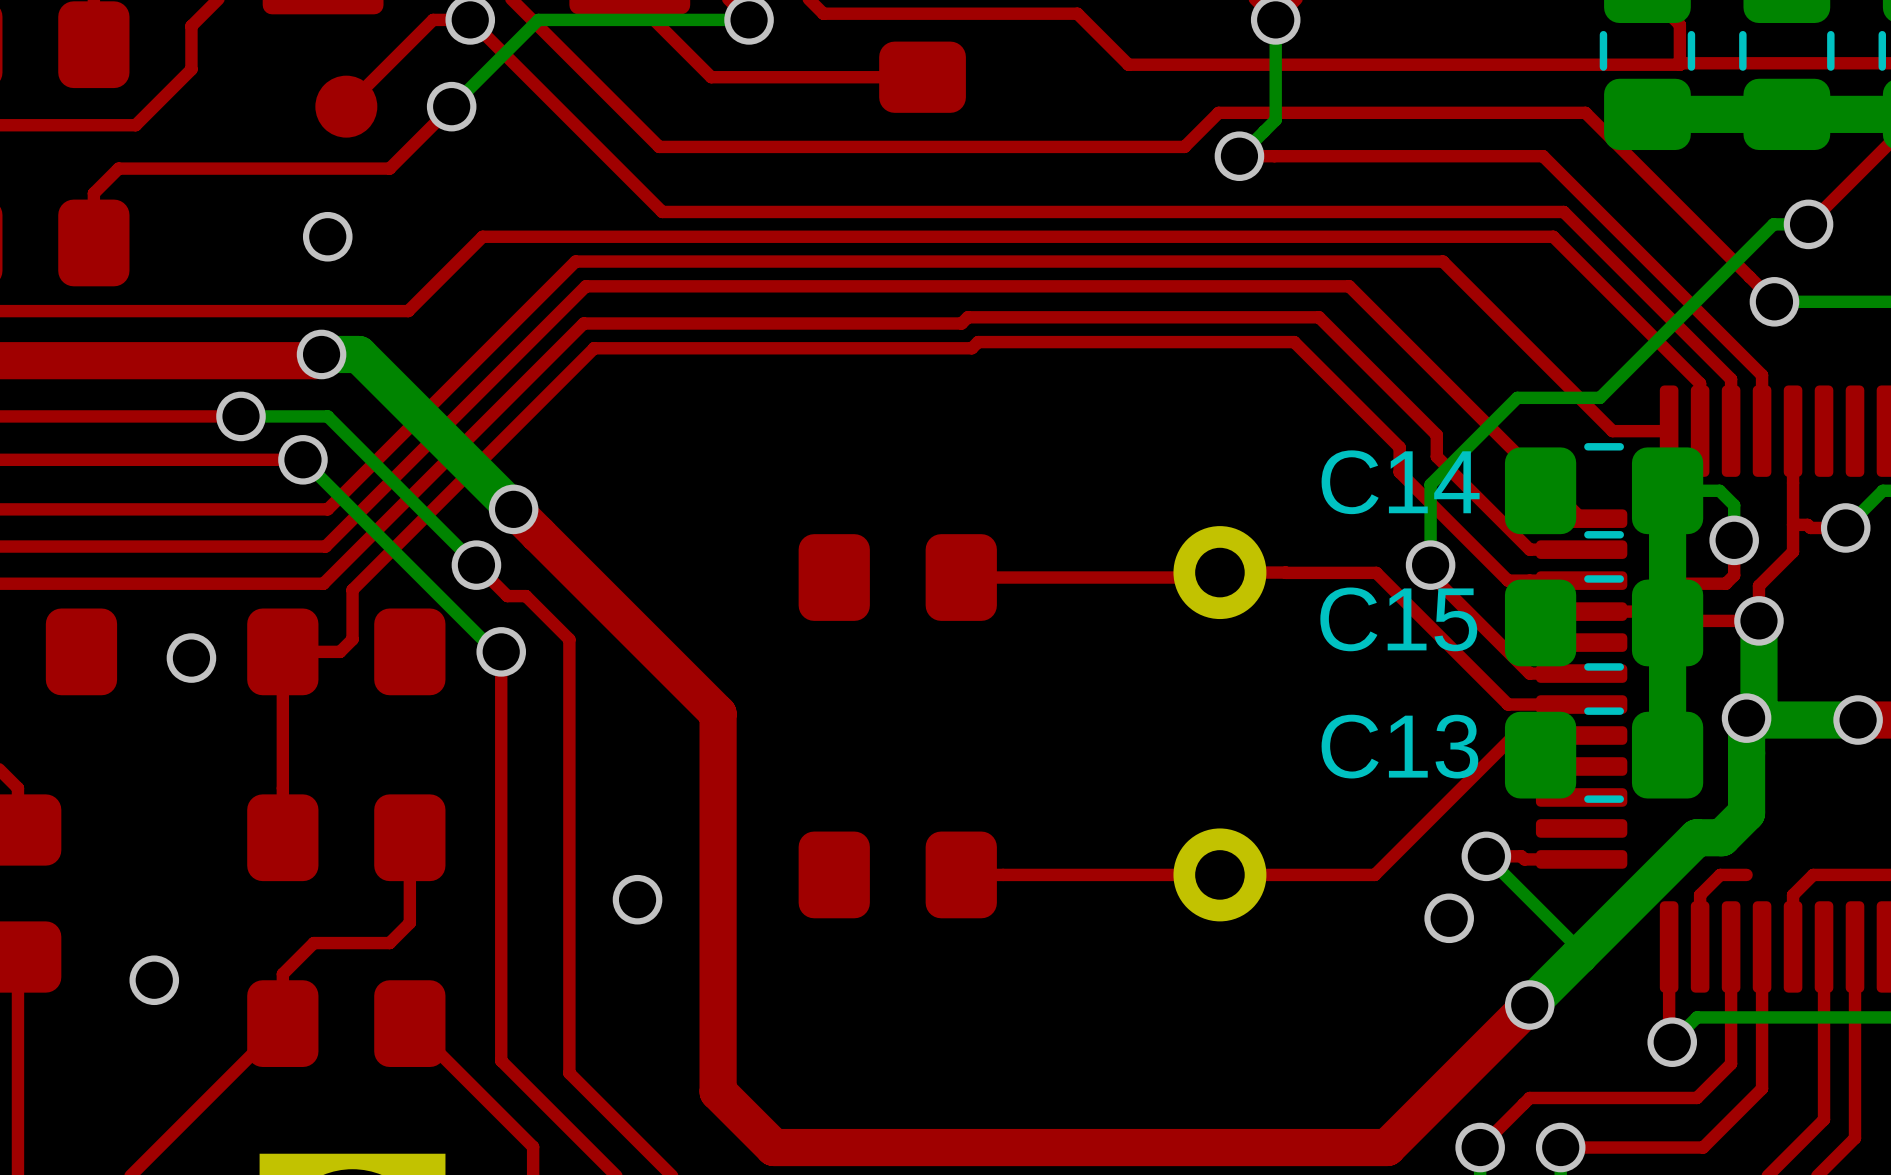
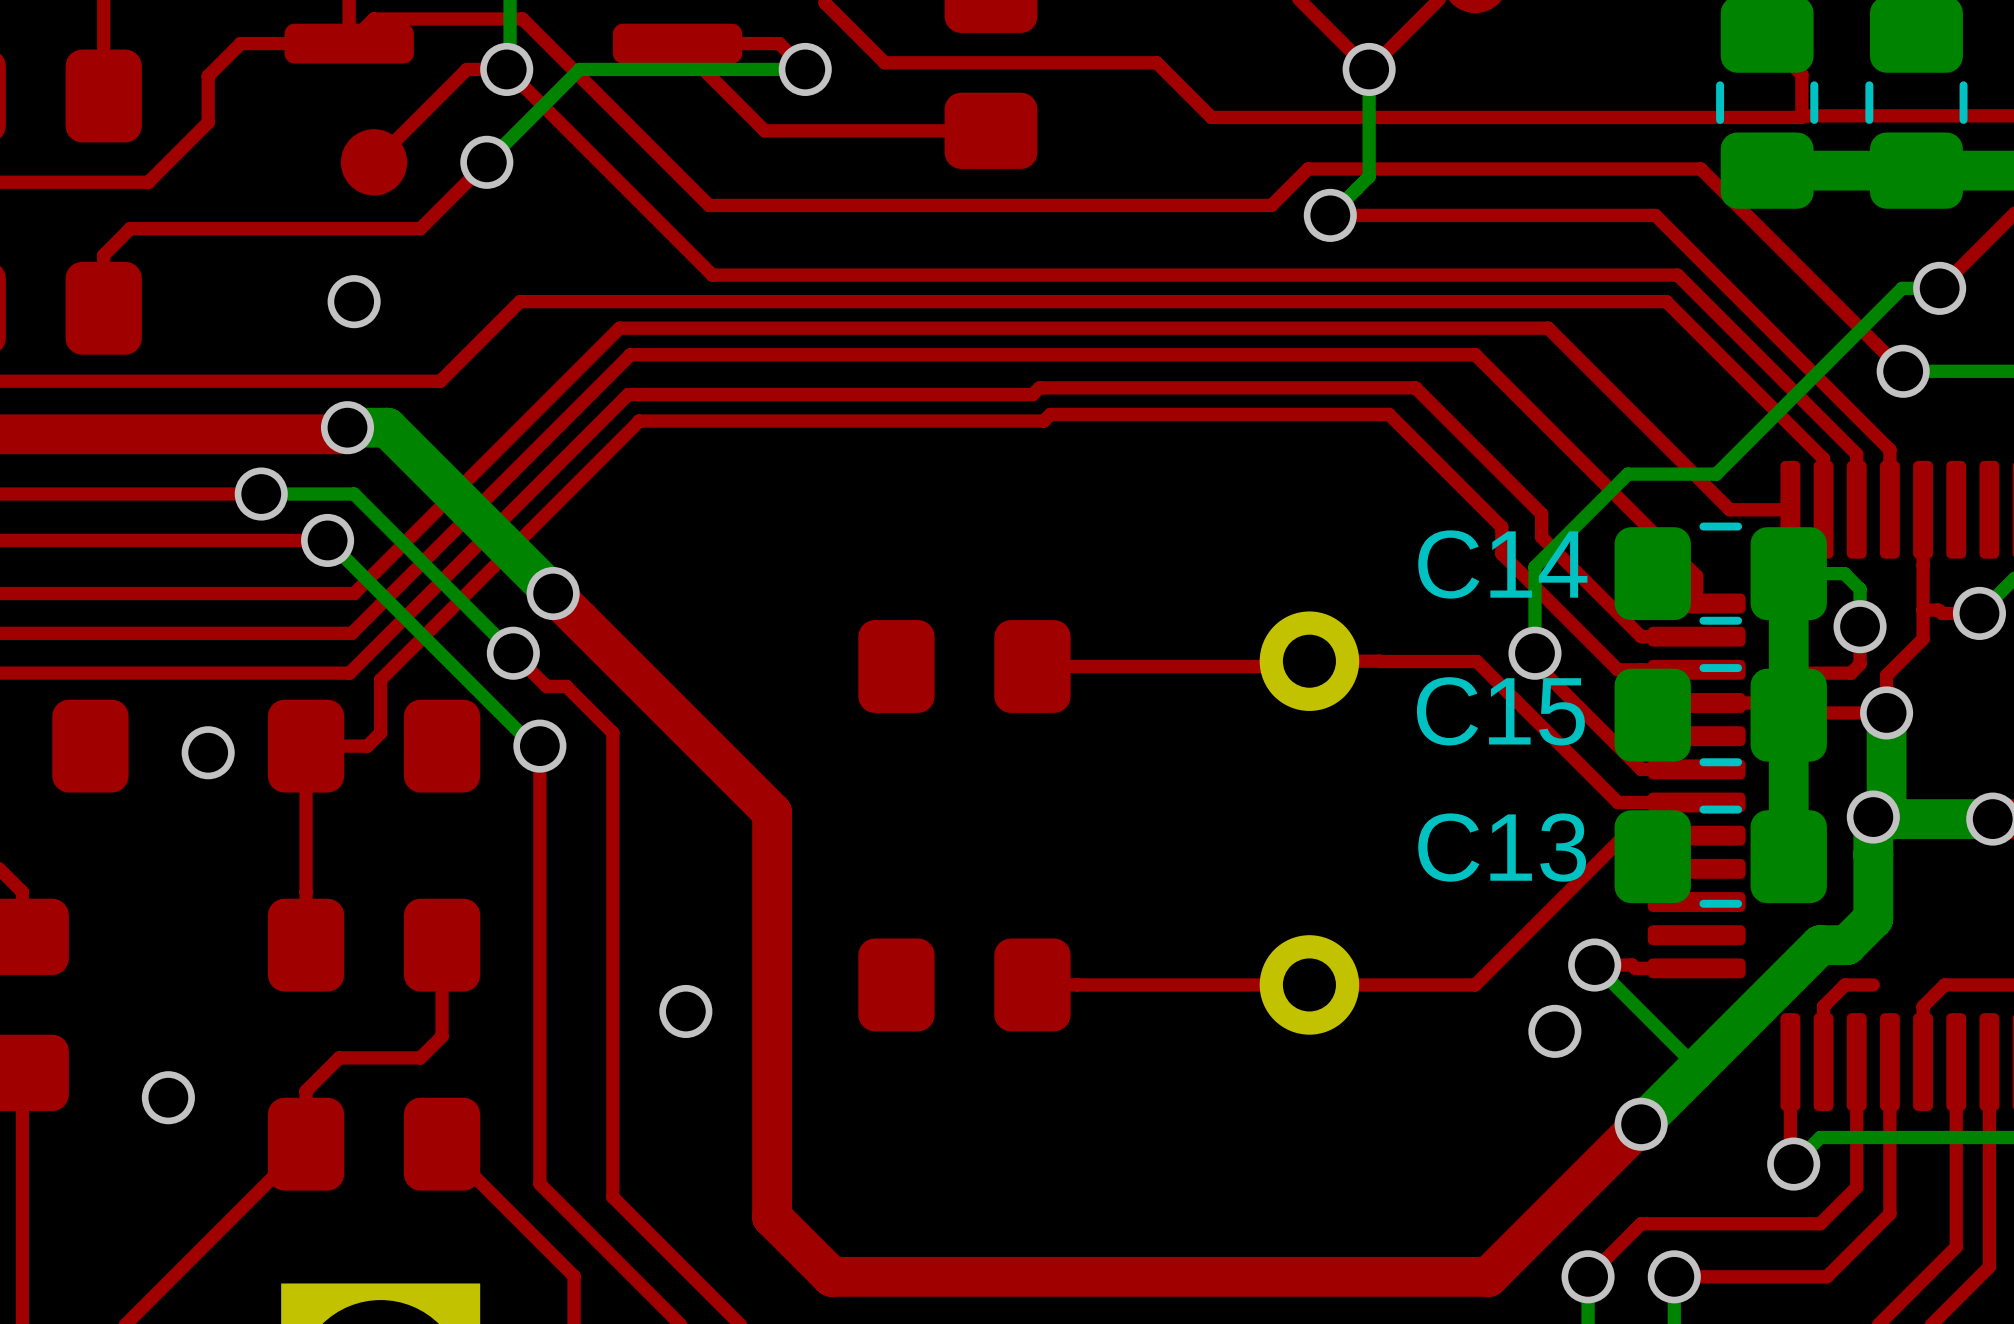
top track: (1349, 286) (1581, 518) -> (1447, 354) (1475, 354) (1696, 576) (1696, 603)

